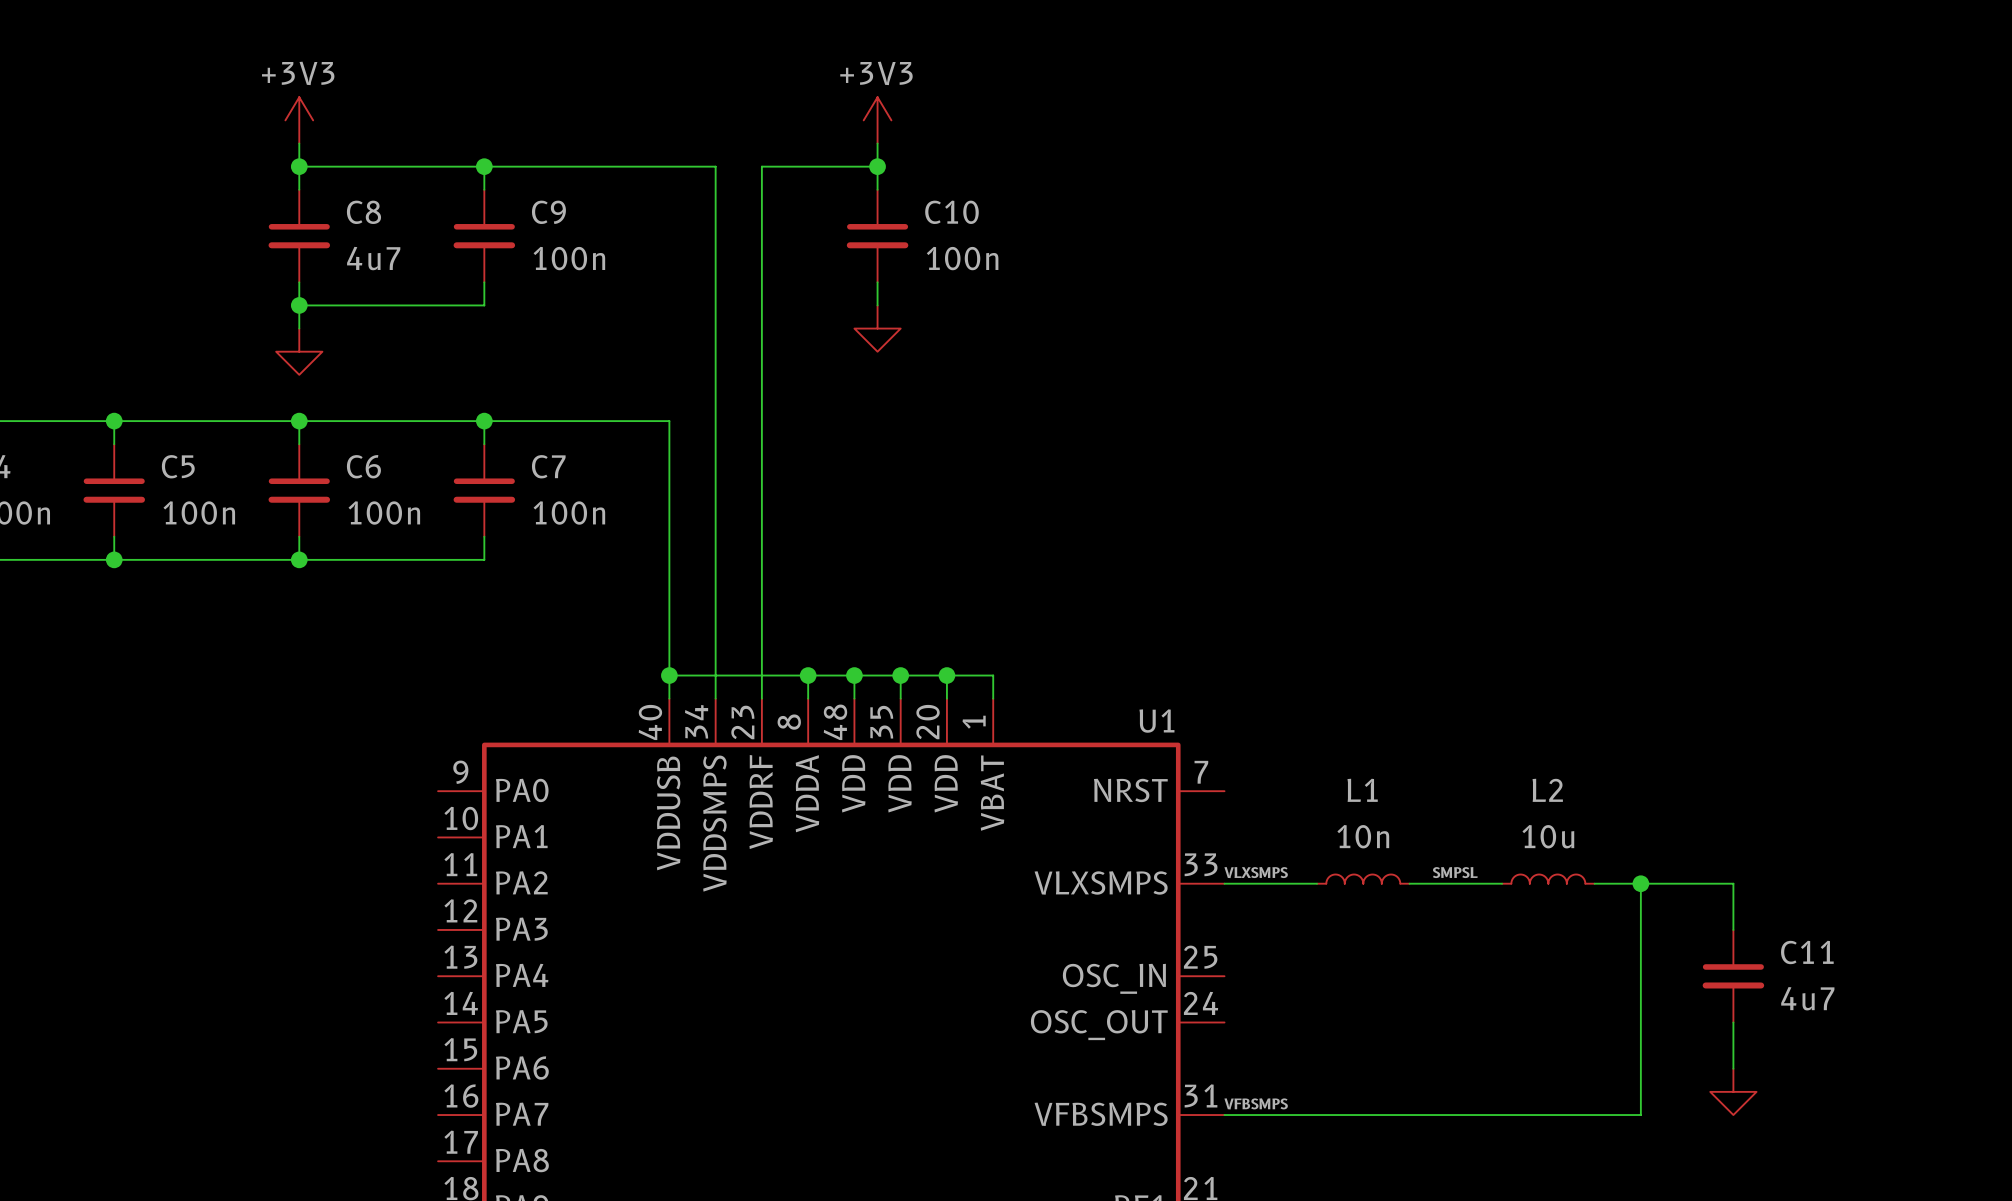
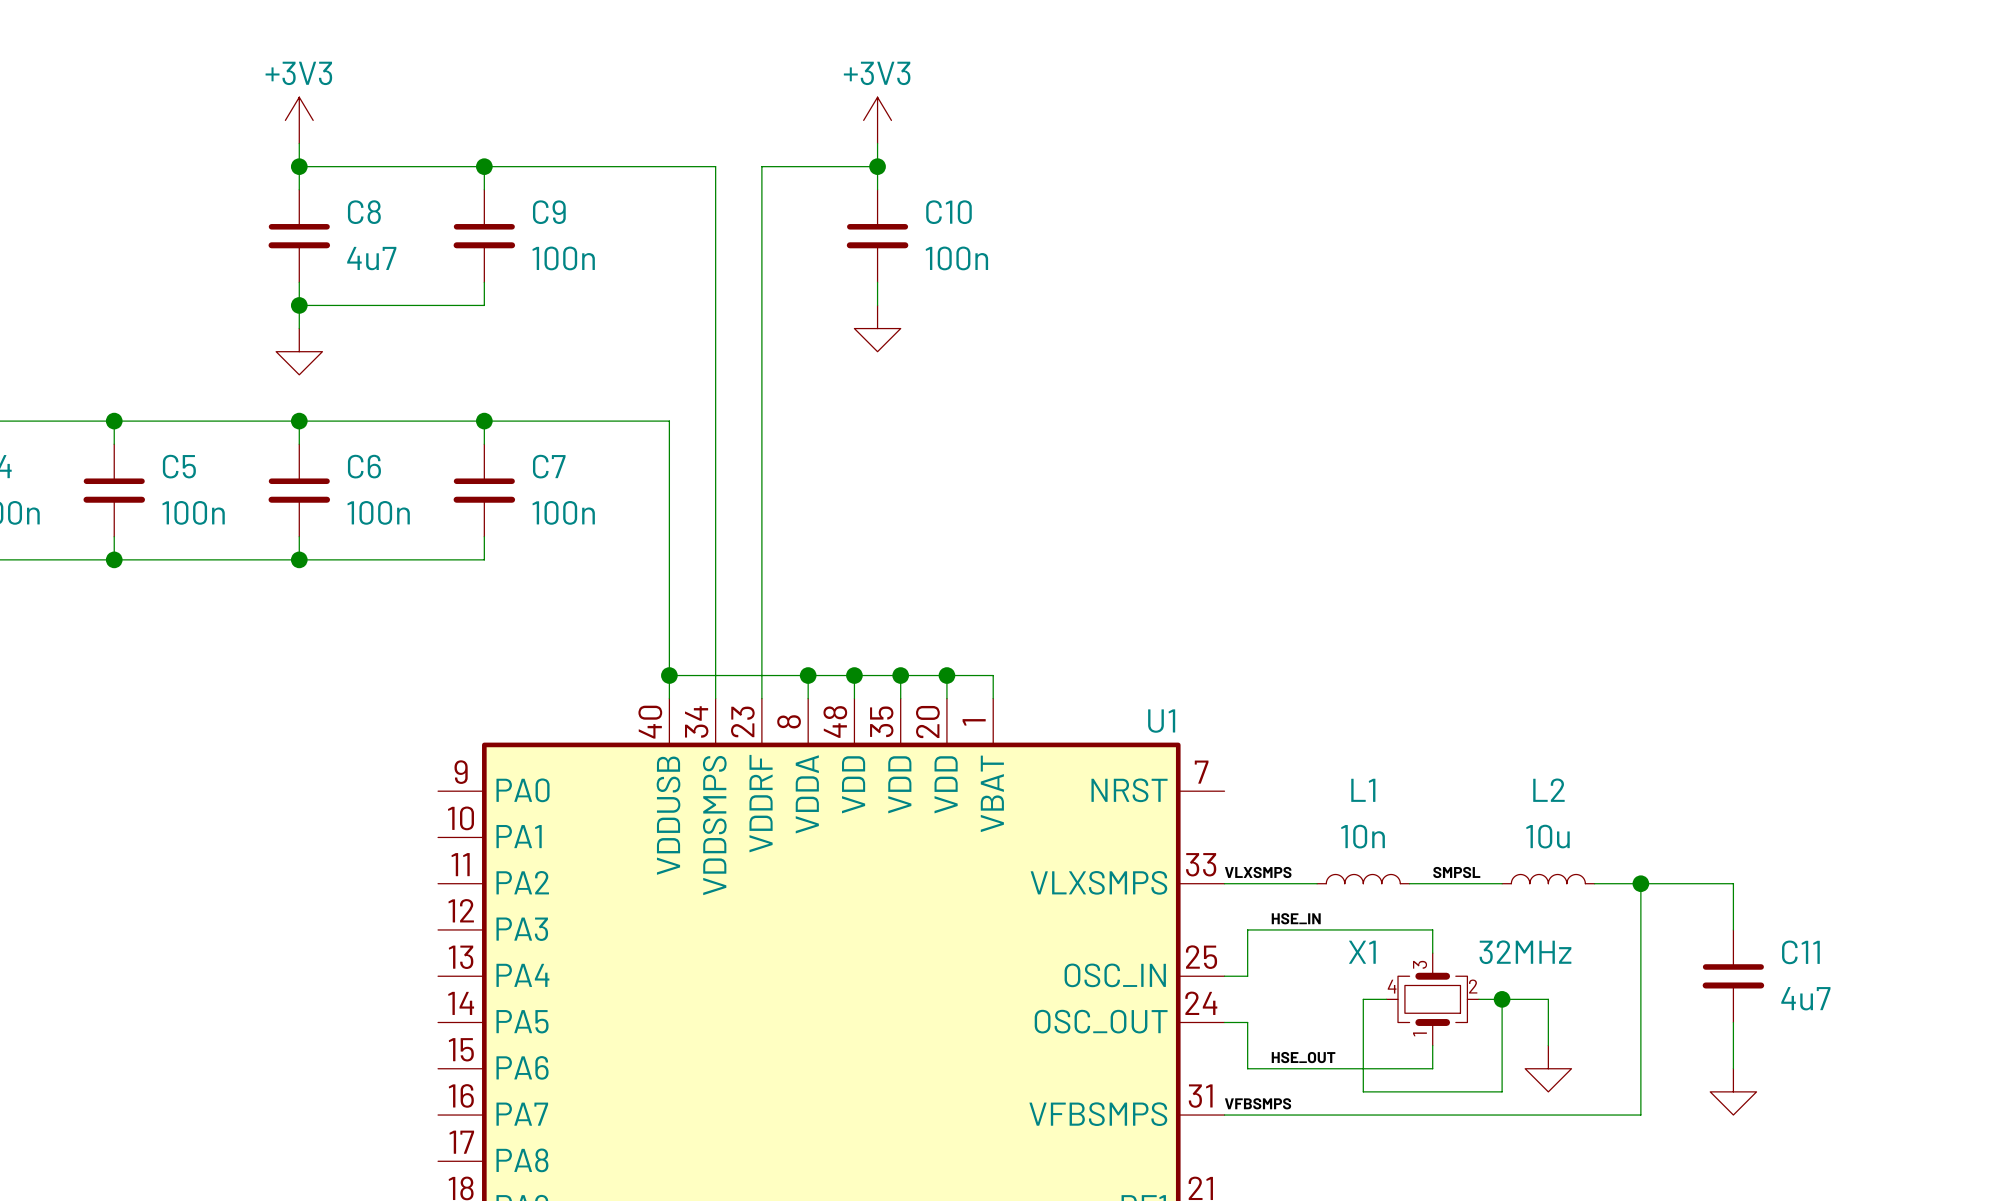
label: none -> HSE_IN (1296, 918)
wire: none -> (1432, 953) (1432, 929) (1247, 929) (1247, 976) (1224, 976)
wire: none -> (1386, 999) (1363, 999) (1363, 1091) (1502, 1091) (1502, 999)
X1: none -> 32MHz (1432, 999)
wire: none -> (1478, 999) (1548, 999) (1548, 1045)
junction: none -> (1502, 999)
wire: none -> (1224, 1022) (1247, 1022) (1247, 1068) (1432, 1068) (1432, 1045)
label: none -> HSE_OUT (1303, 1057)
power symbol: none -> (1548, 1068)

